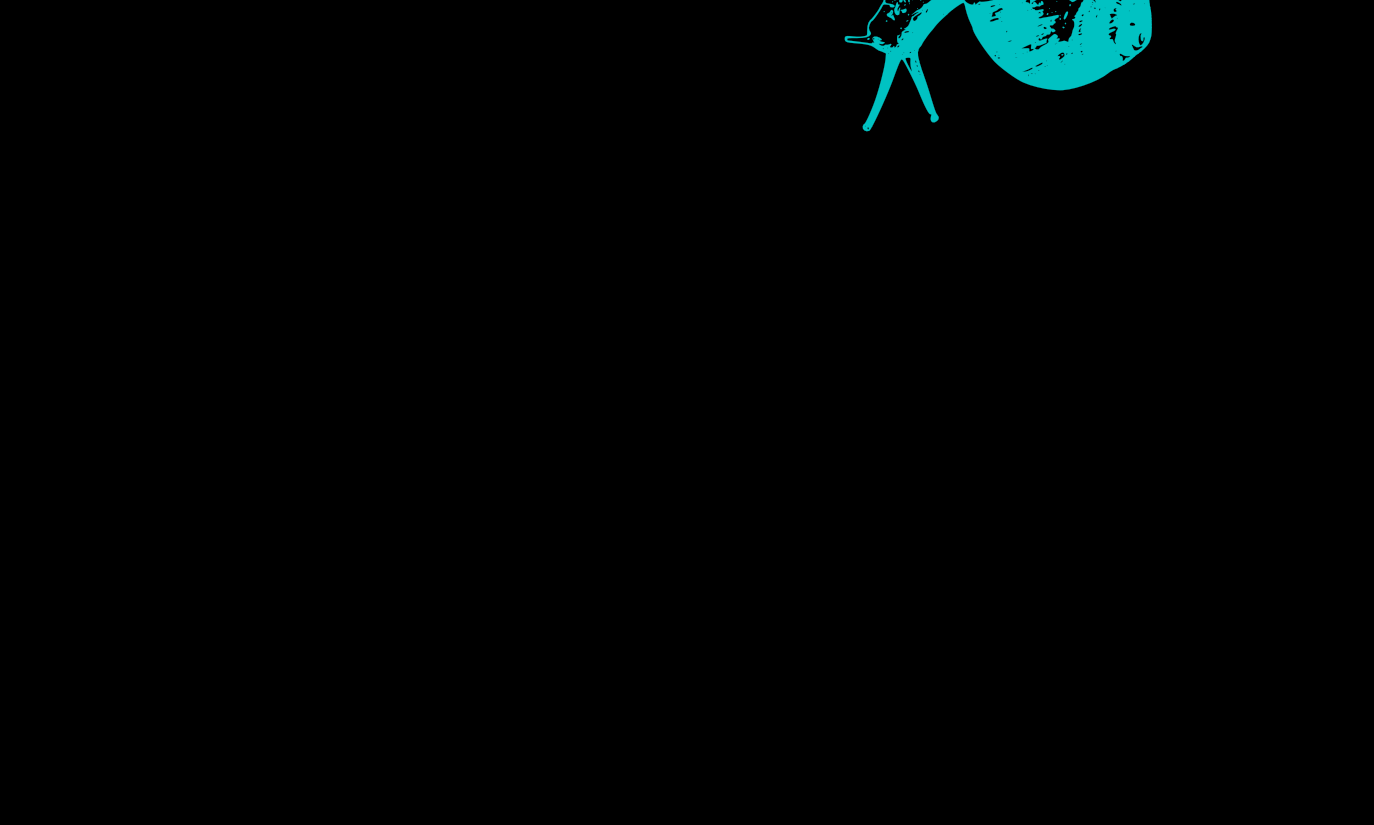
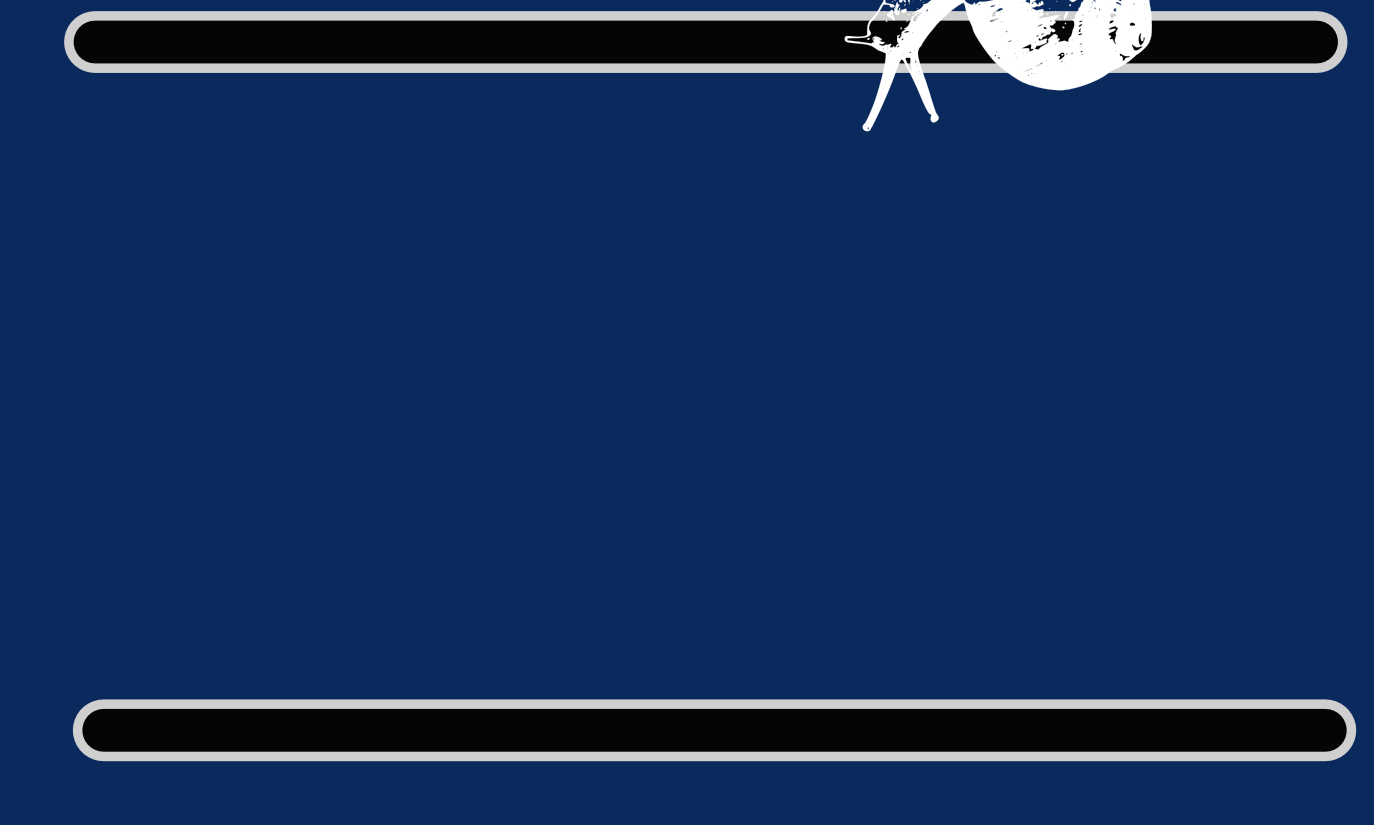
part: none -> (705, 42)
part: none -> (714, 730)

